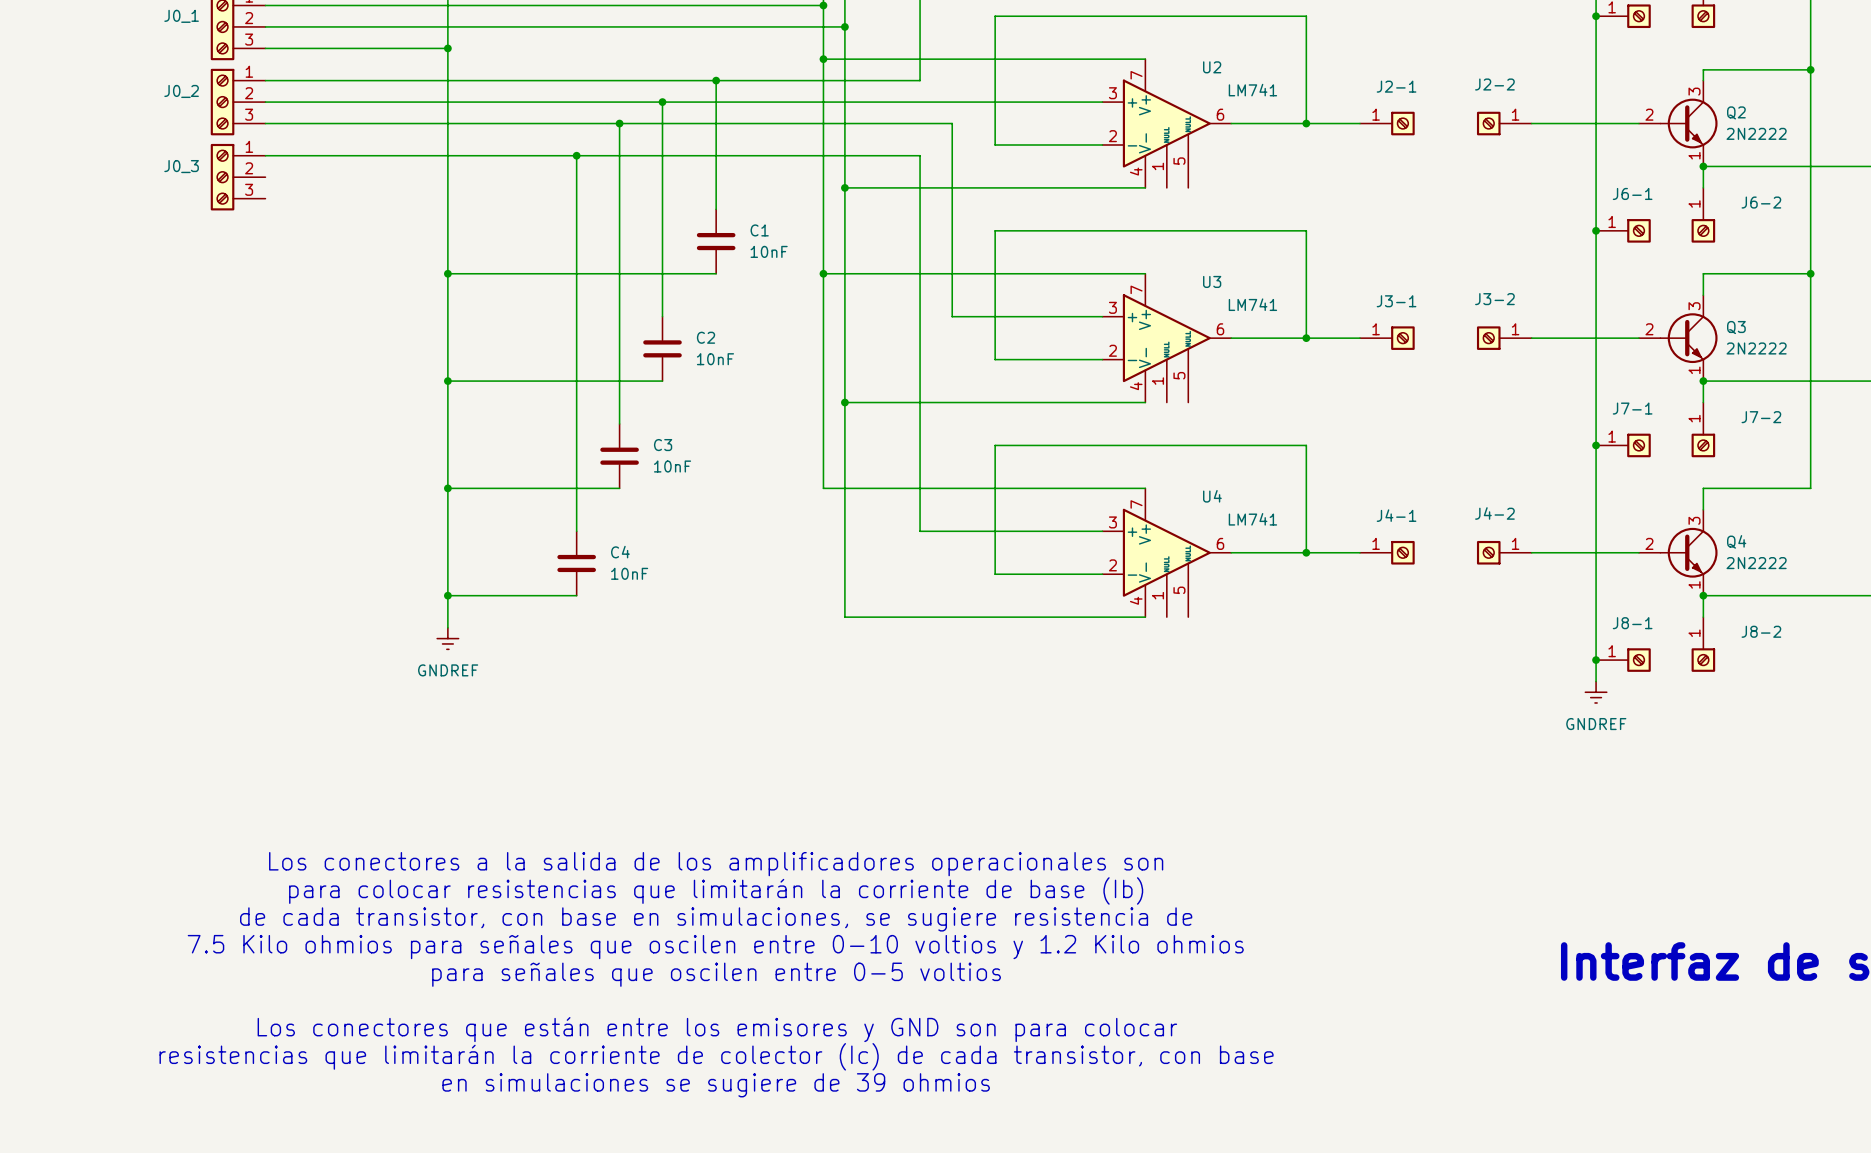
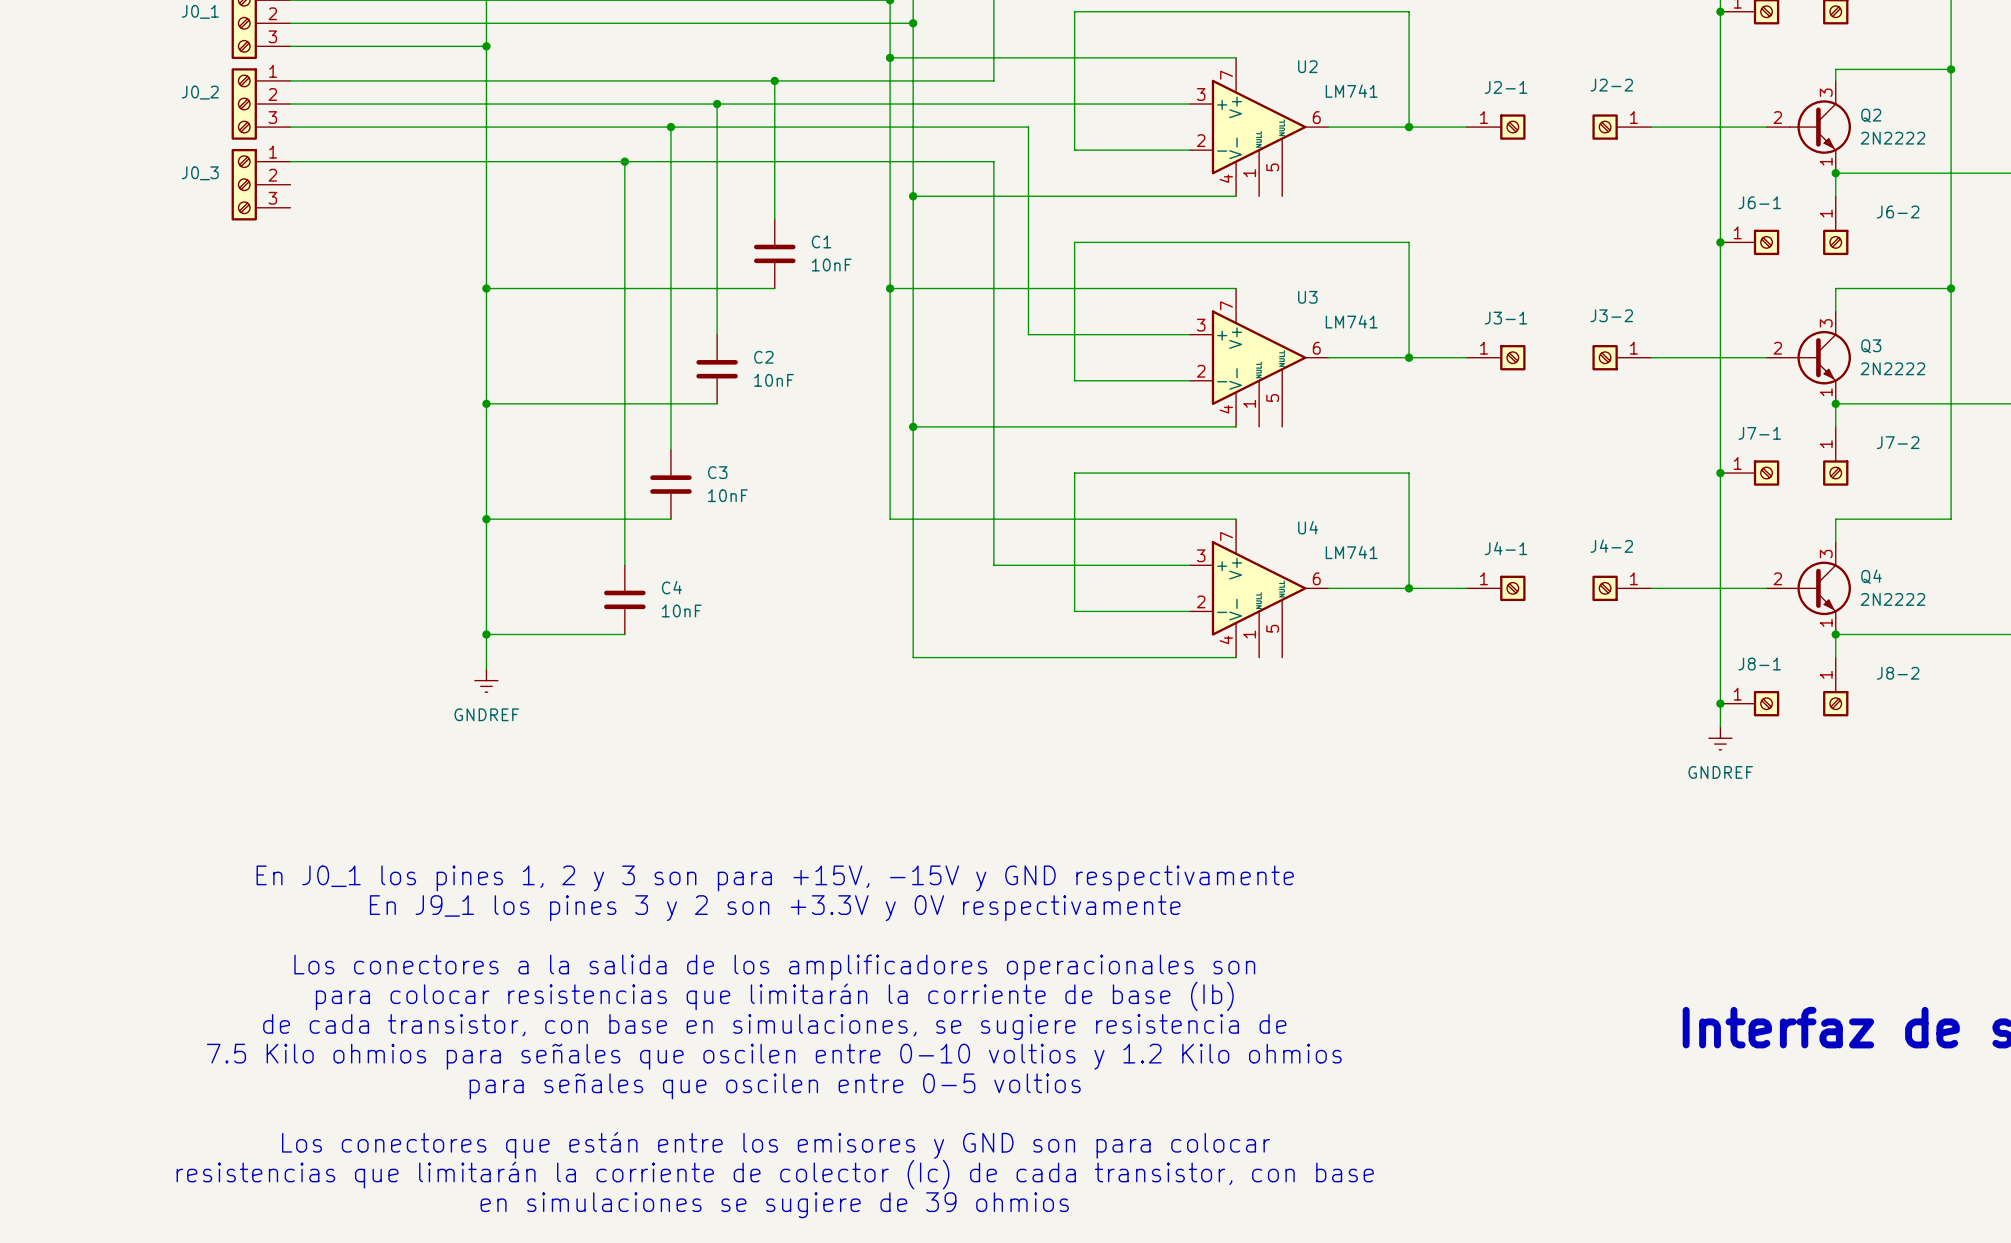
text: none -> En J0_1 los pines 1, 2 y 3 son para +15V, -15V y GND respectivamente (775, 878)
text: none -> En J9_1 los pines 3 y 2 son +3.3V y 0V respectivamente (775, 908)
text position: Los conectores a la salida de los amplificadores operacionales son (716, 864) -> Los conectores a la salida de los amplificadores operacionales son (774, 967)
text position: para colocar resistencias que limitarán la corriente de base (Ib) (716, 890) -> para colocar resistencias que limitarán la corriente de base (Ib) (774, 996)
text position: de cada transistor, con base en simulaciones, se sugiere resistencia de (716, 919) -> de cada transistor, con base en simulaciones, se sugiere resistencia de (774, 1026)
text position: 7.5 Kilo ohmios para señales que oscilen entre 0-10 voltios y 1.2 Kilo ohmios (715, 947) -> 7.5 Kilo ohmios para señales que oscilen entre 0-10 voltios y 1.2 Kilo ohmios (774, 1056)
text position: para señales que oscilen entre 0-5 voltios (716, 974) -> para señales que oscilen entre 0-5 voltios (775, 1086)
text position: Los conectores que están entre los emisores y GND son para colocar (717, 1029) -> Los conectores que están entre los emisores y GND son para colocar (776, 1145)
text position: resistencias que limitarán la corriente de colector (Ic) de cada transistor, con base (716, 1056) -> resistencias que limitarán la corriente de colector (Ic) de cada transistor, con base (775, 1174)
text position: en simulaciones se sugiere de 39 ohmios (716, 1085) -> en simulaciones se sugiere de 39 ohmios (774, 1205)

